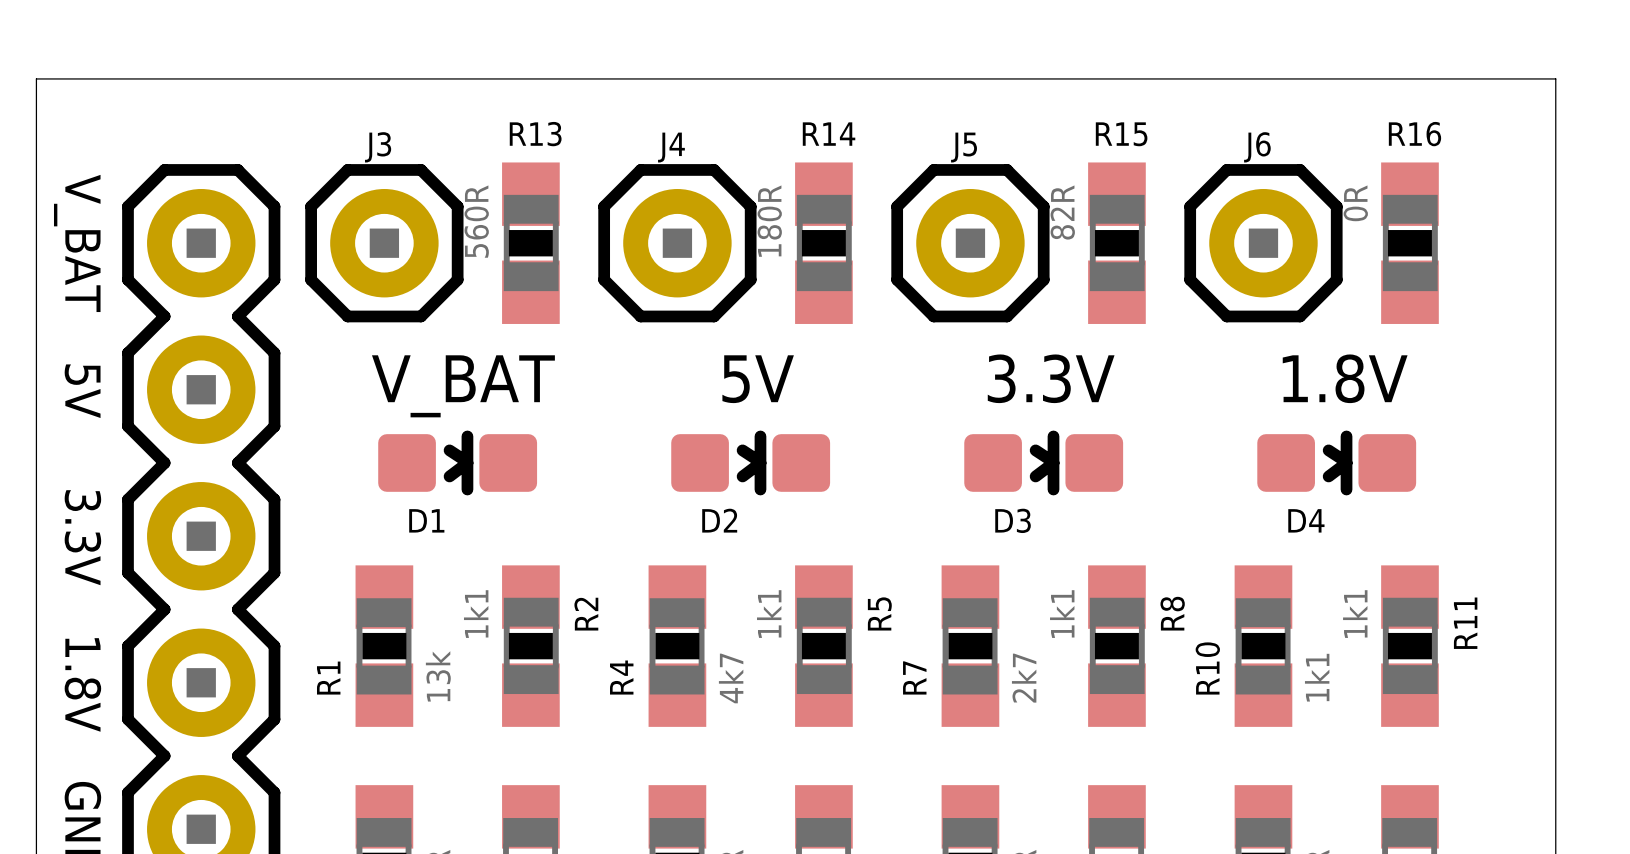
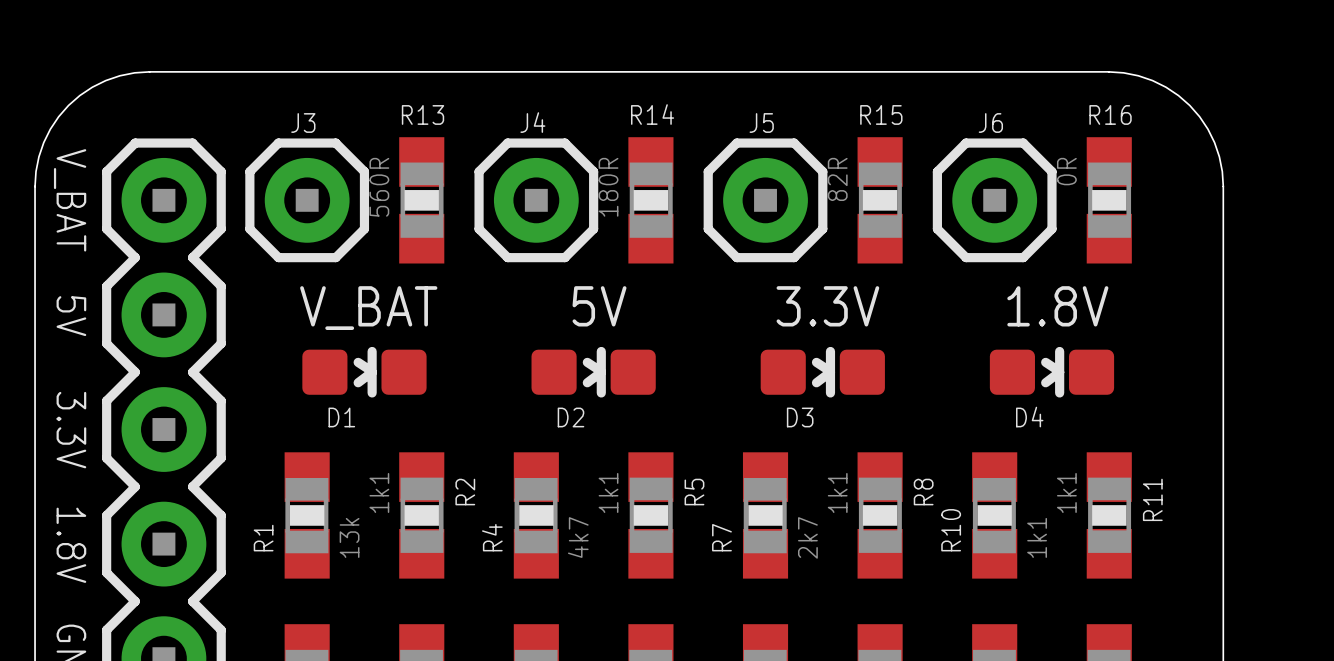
board edge: (182, 78) (36, 78) (36, 225) -> (149, 71) (119, 75) (105, 80) (79, 95) (68, 105) (58, 116) (43, 142) (38, 156) (35, 186)
board edge: (1409, 78) (1555, 78) (1555, 225) -> (1108, 71) (1138, 75) (1152, 80) (1178, 95) (1189, 105) (1199, 116) (1214, 142) (1219, 156) (1223, 186)

